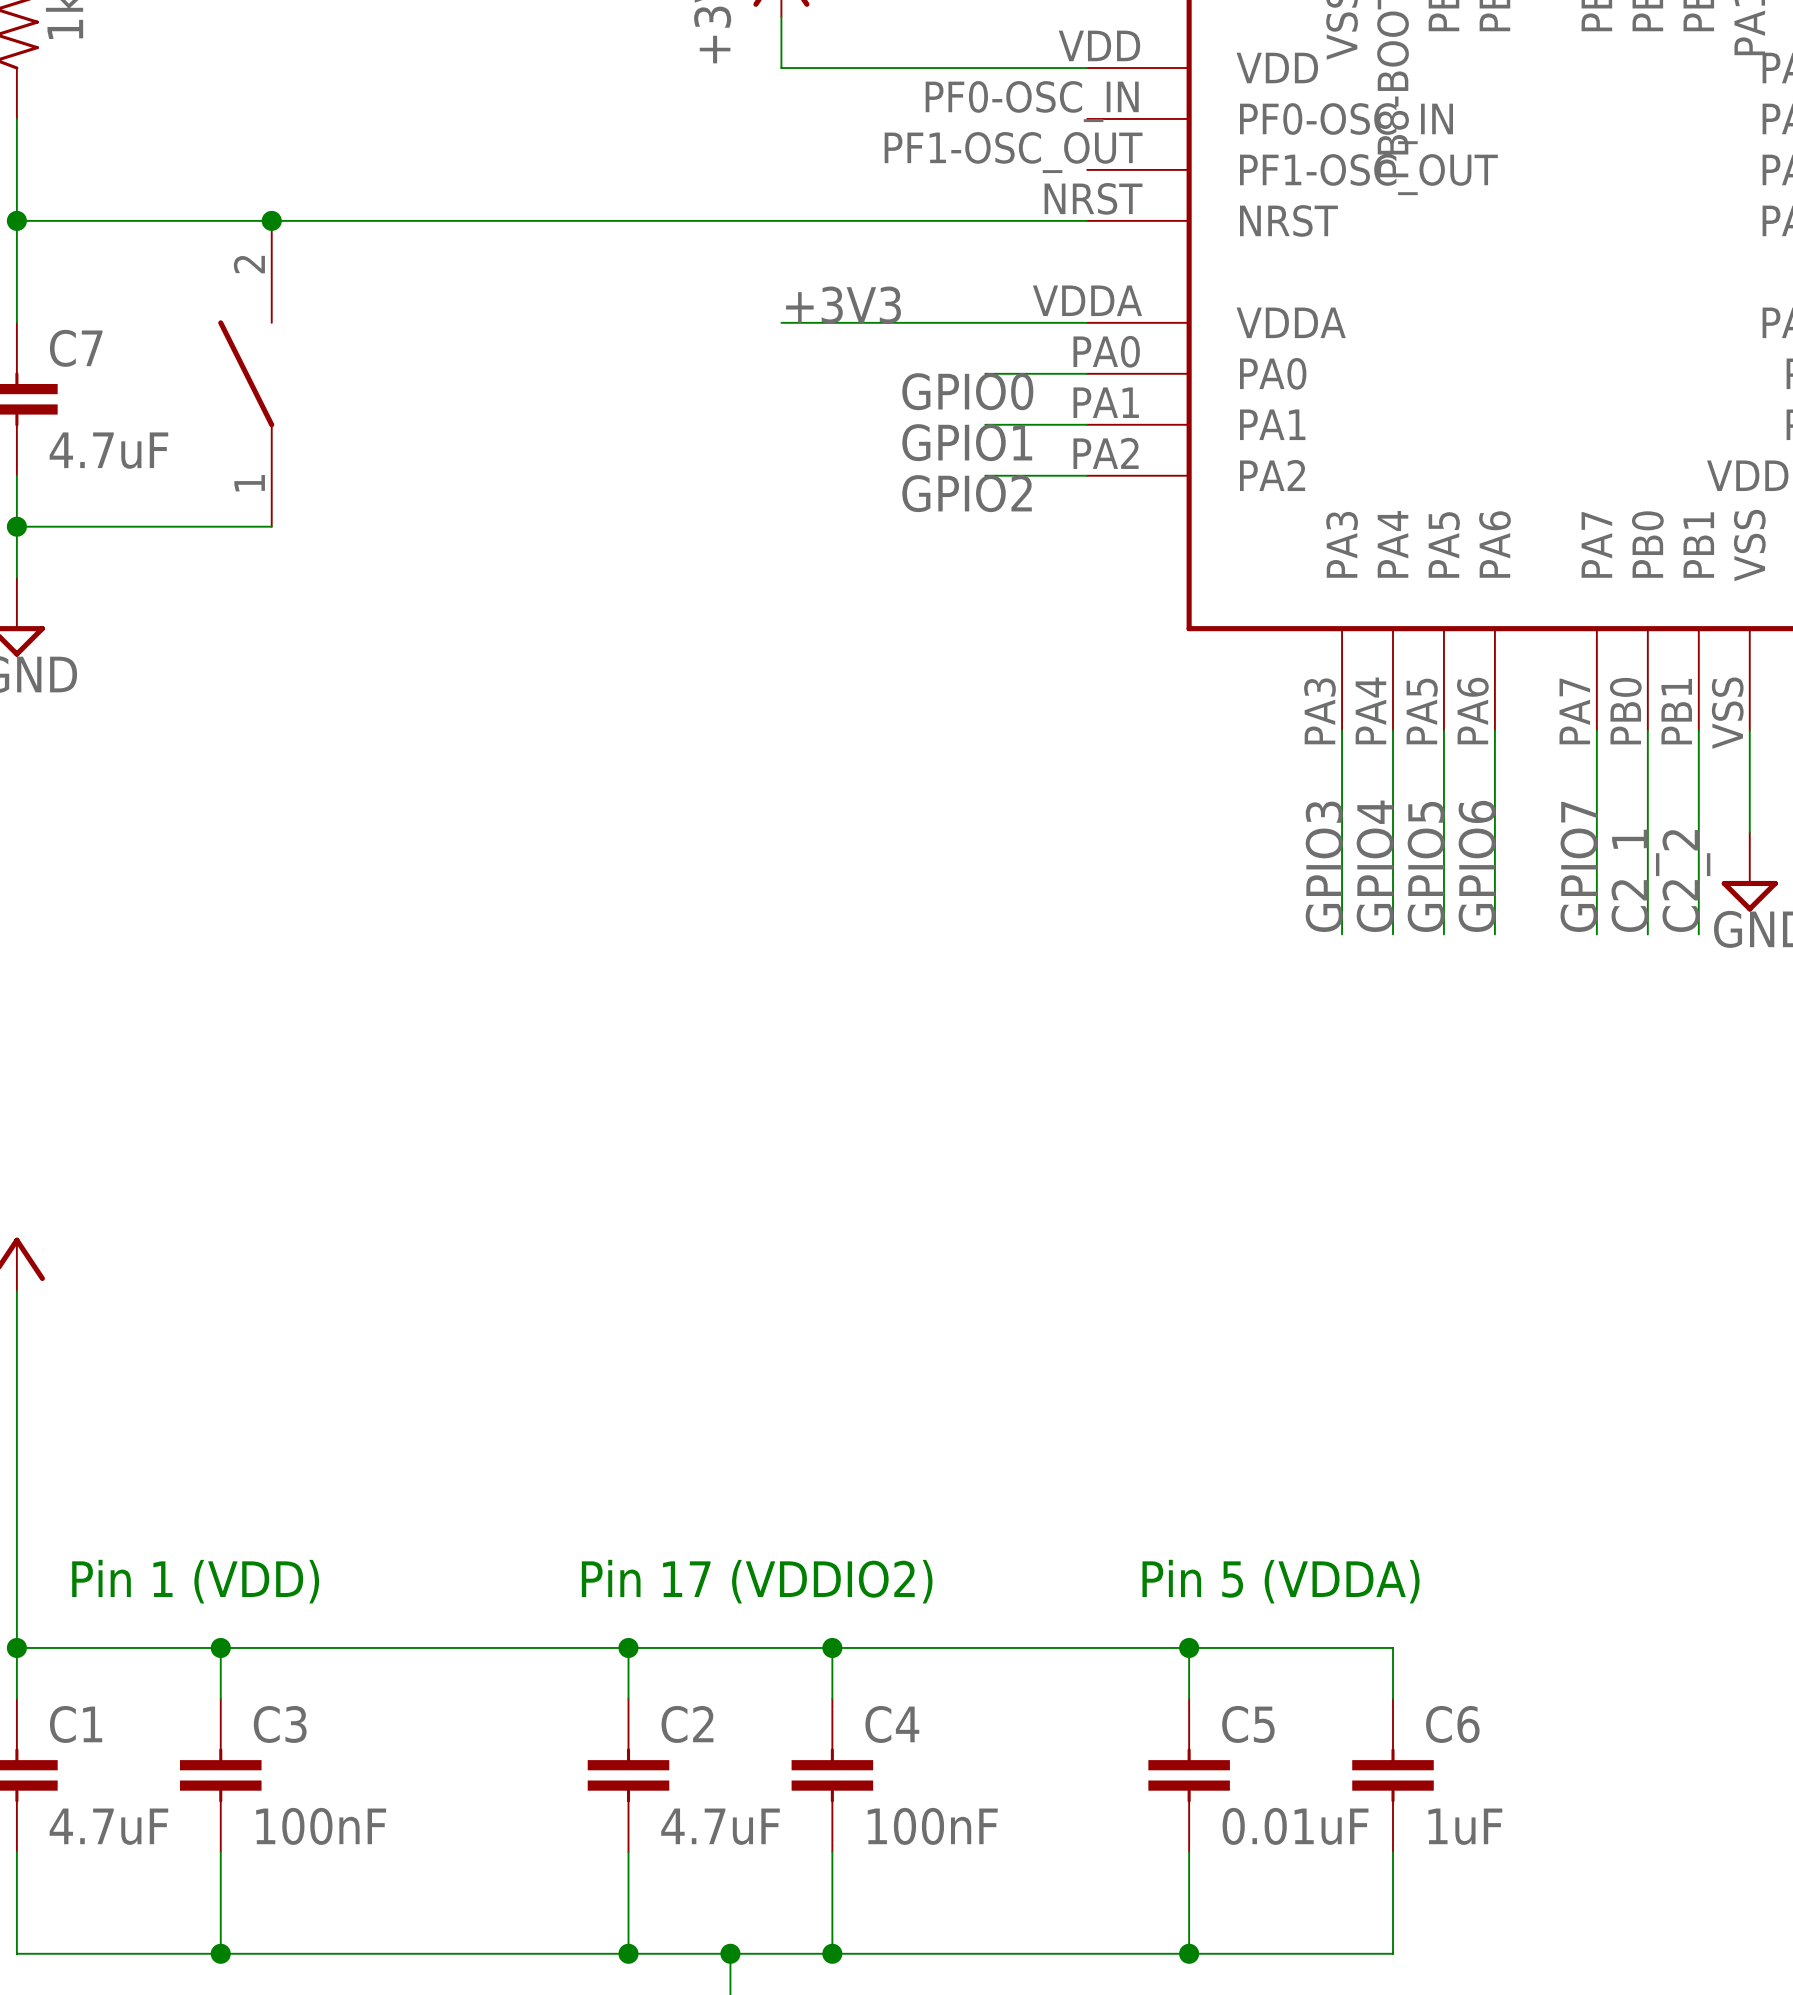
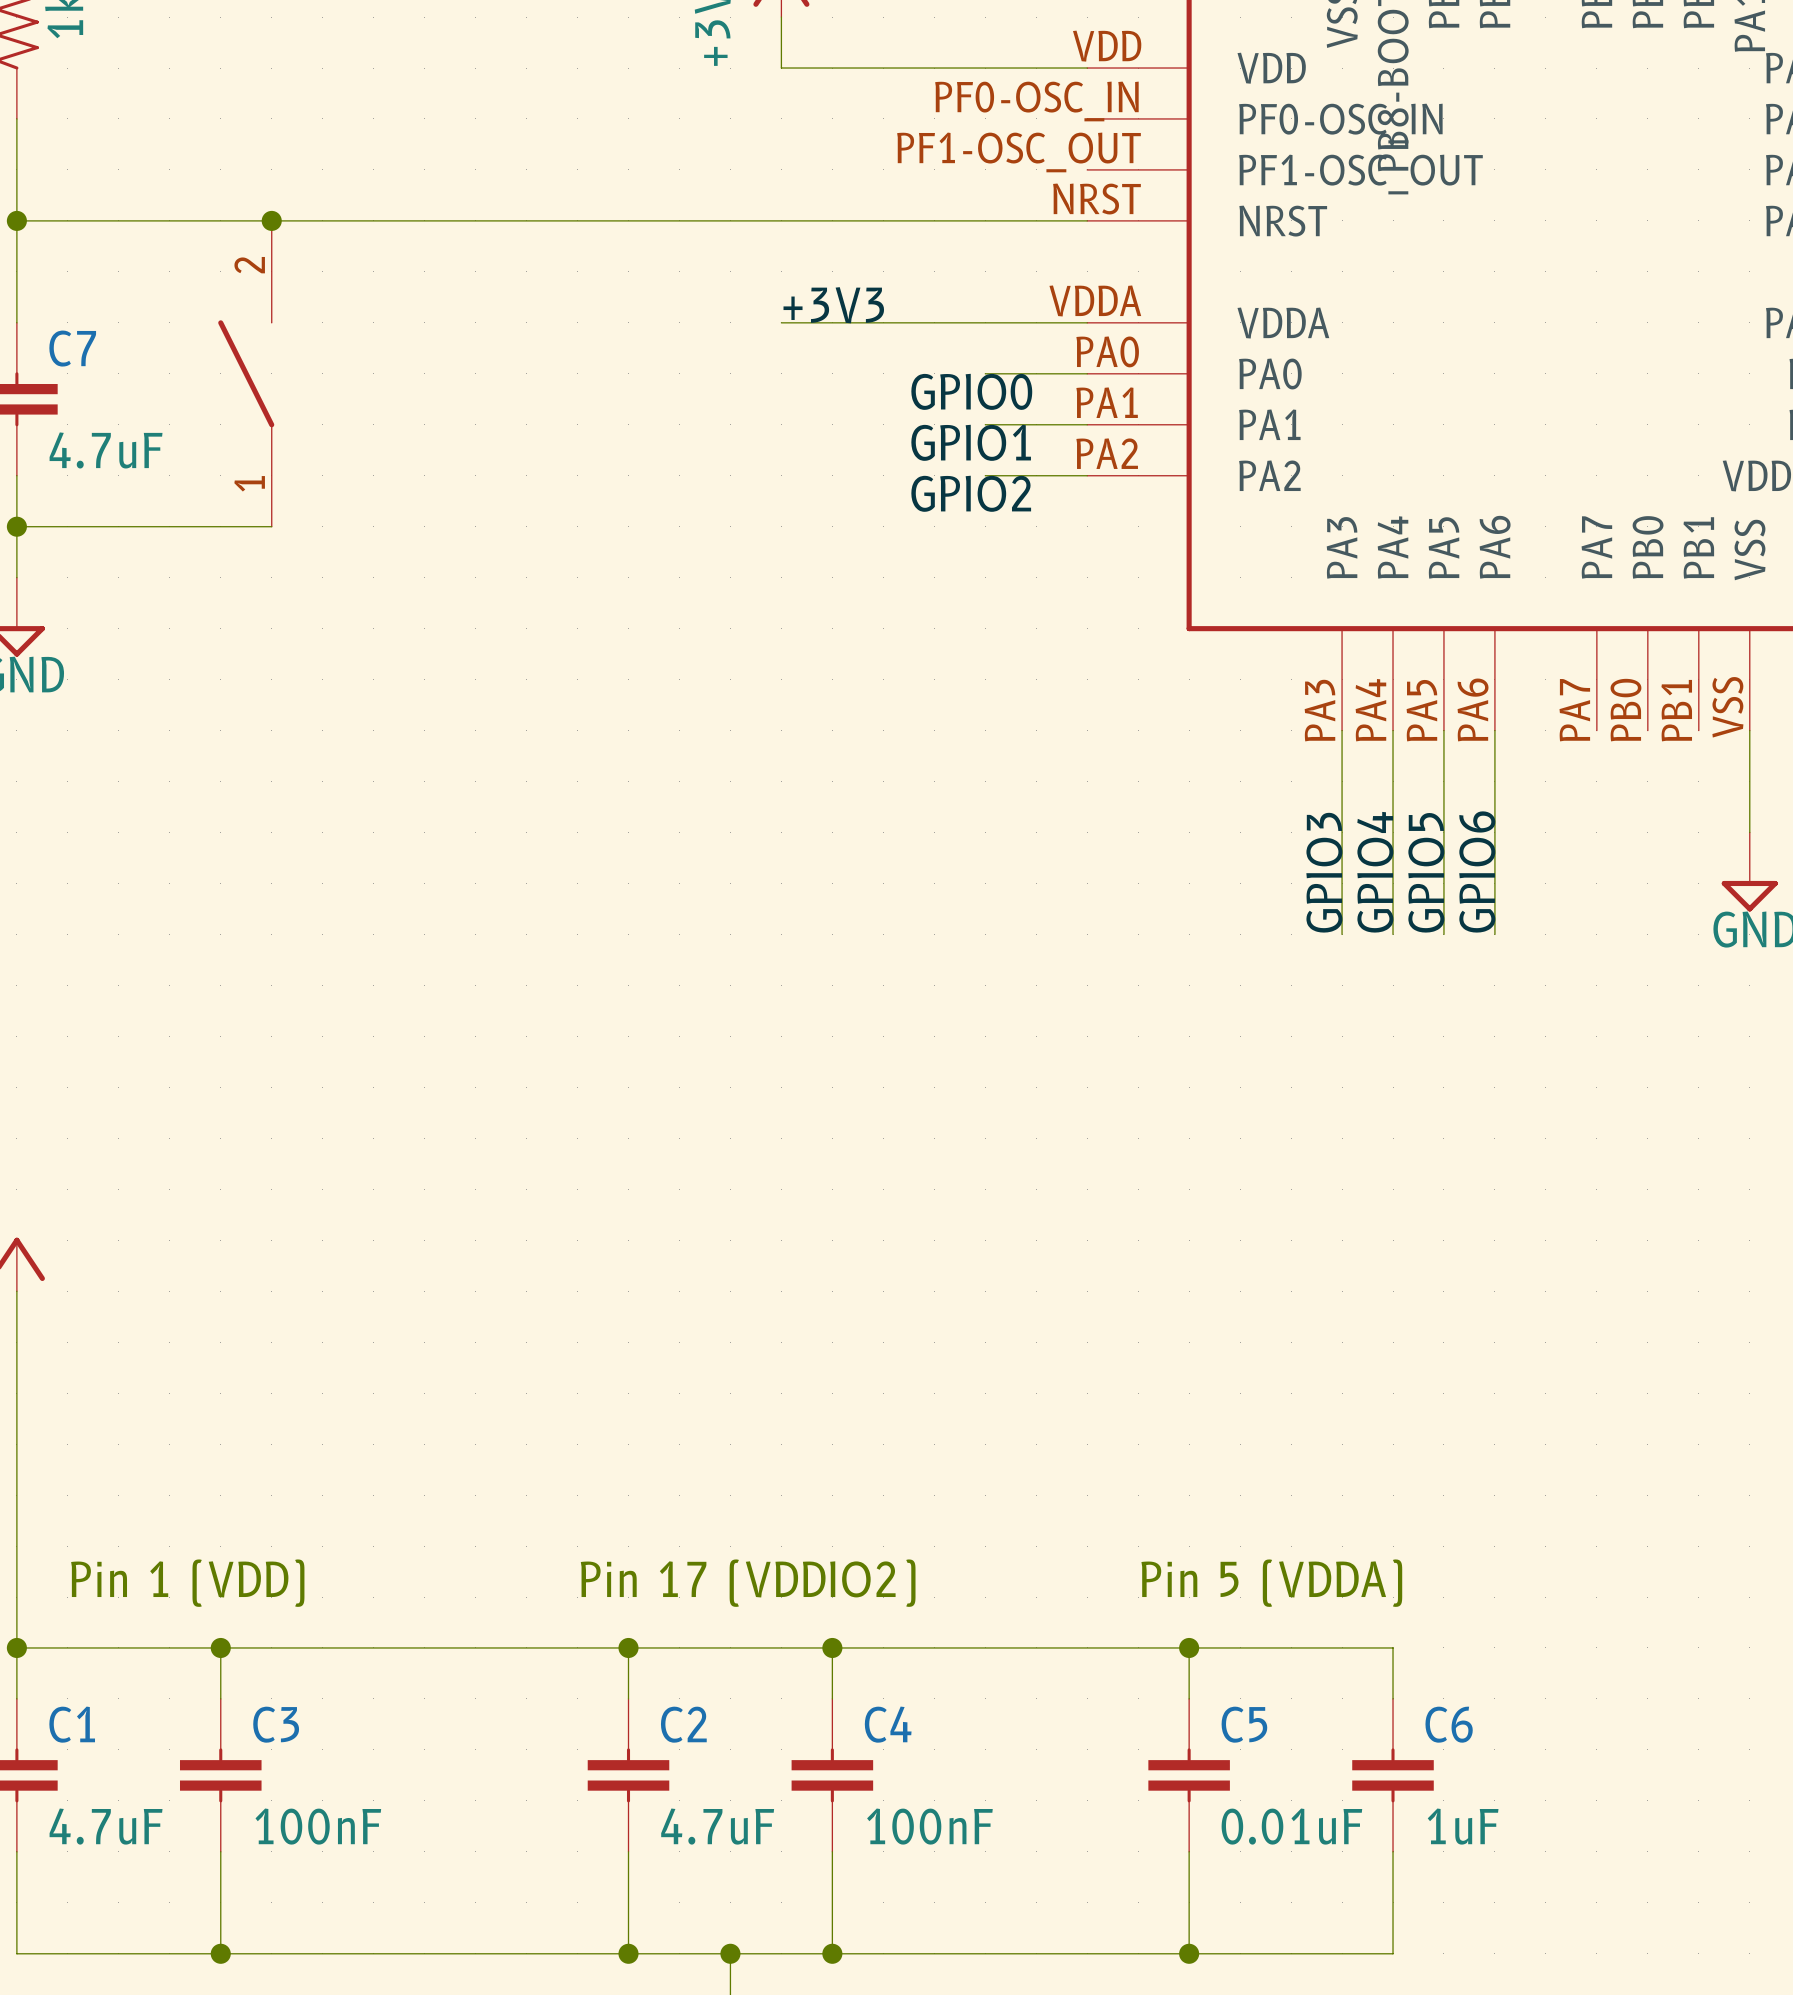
wire: (1596, 730) (1596, 934) -> none
wire: (1647, 730) (1647, 934) -> none
wire: (1698, 730) (1698, 934) -> none
label: GPIO7 (1579, 866) -> none
label: C2_1 (1635, 880) -> none
label: C2_2 (1686, 881) -> none

